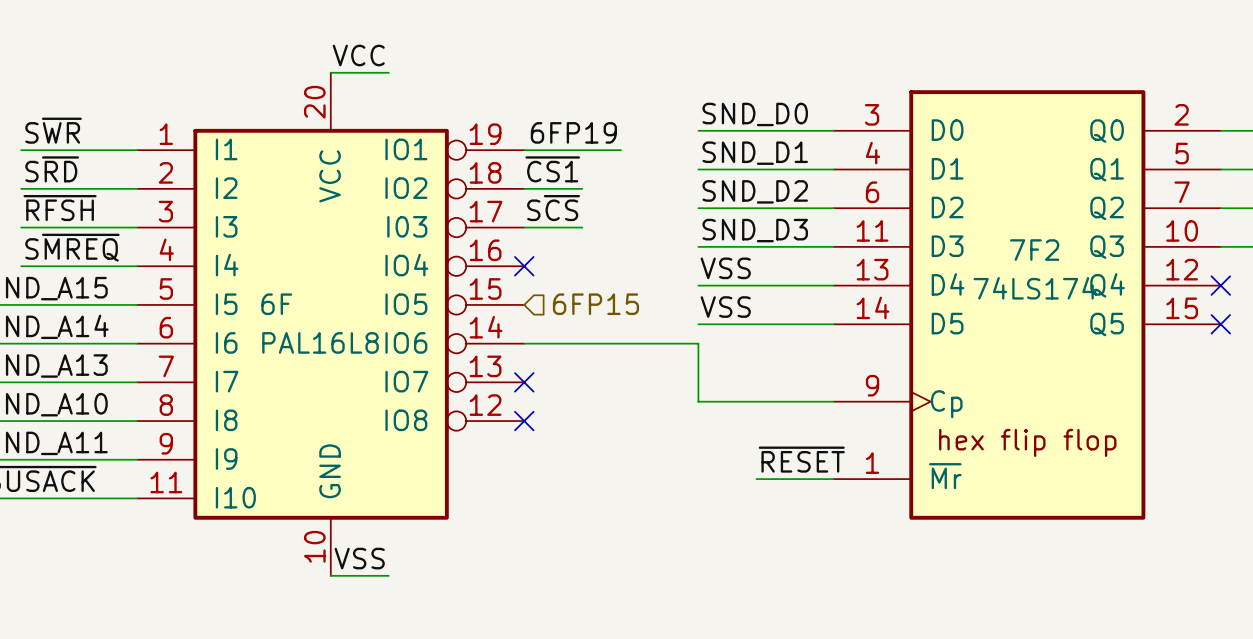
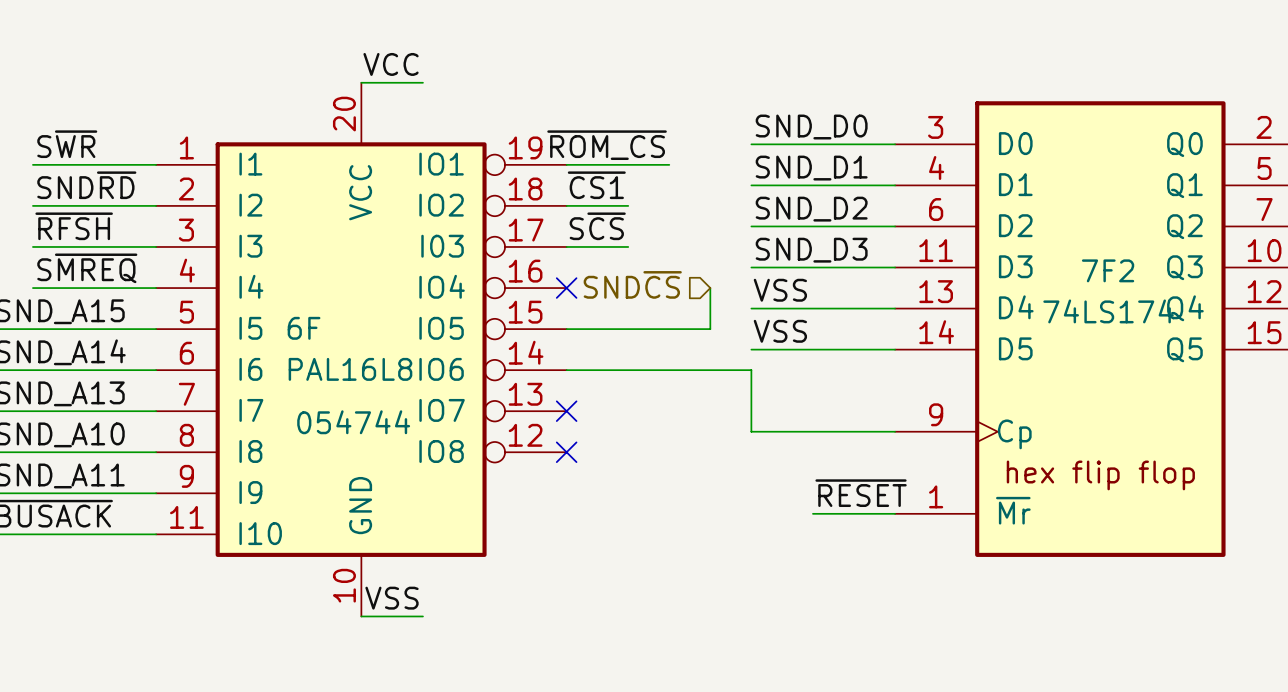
label: 6FP19 (573, 132) -> ~{ROM_CS} (607, 145)
label: S~{RD} (52, 169) -> SND~{RD} (86, 185)
hierarchical label: none -> SND~{CS} (632, 284)
wire: none -> (710, 288) (710, 329) (566, 329)
hierarchical label: 6FP15 (595, 304) -> none
6F text: none -> 054744 (353, 422)

